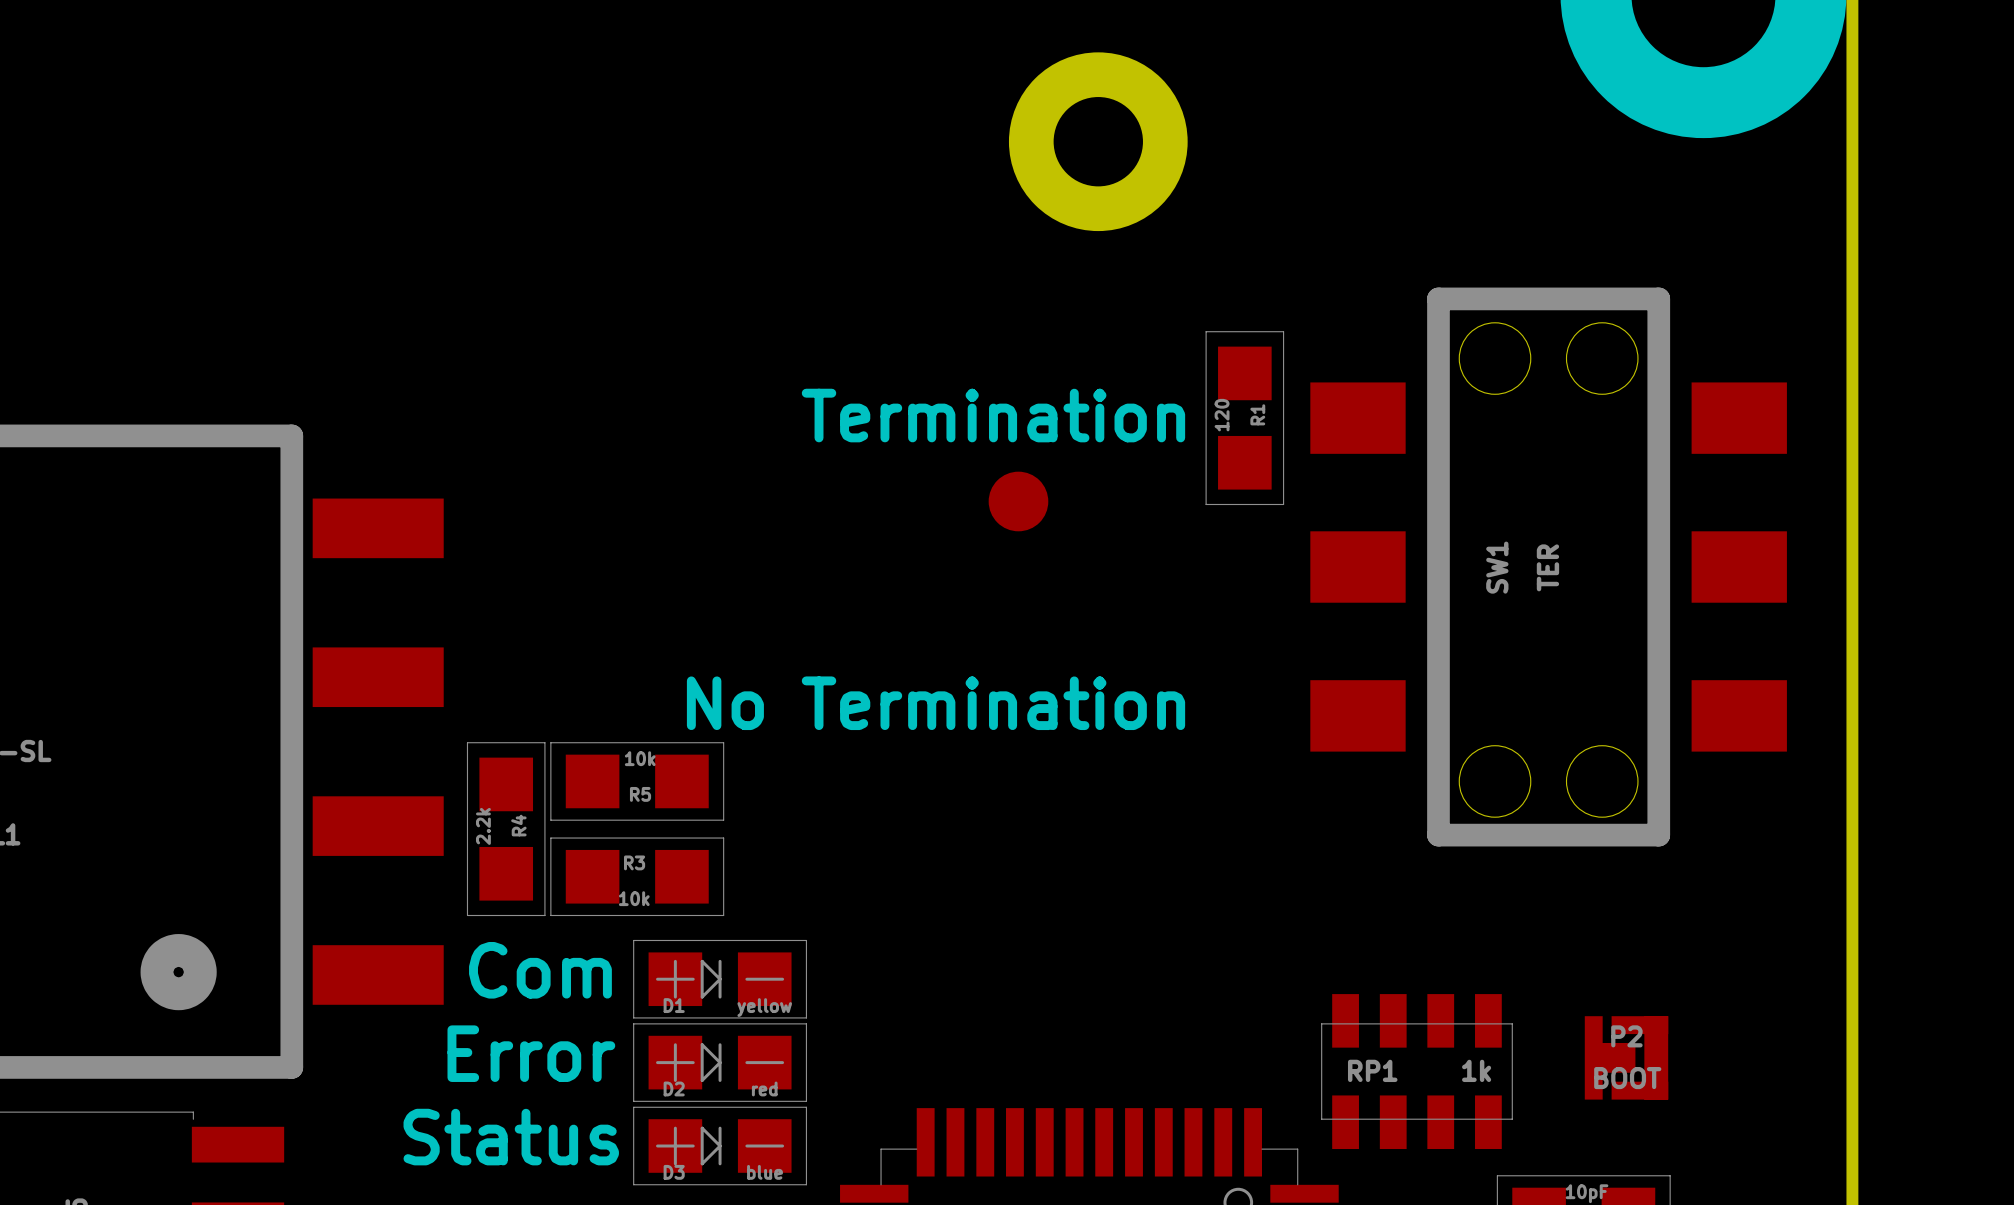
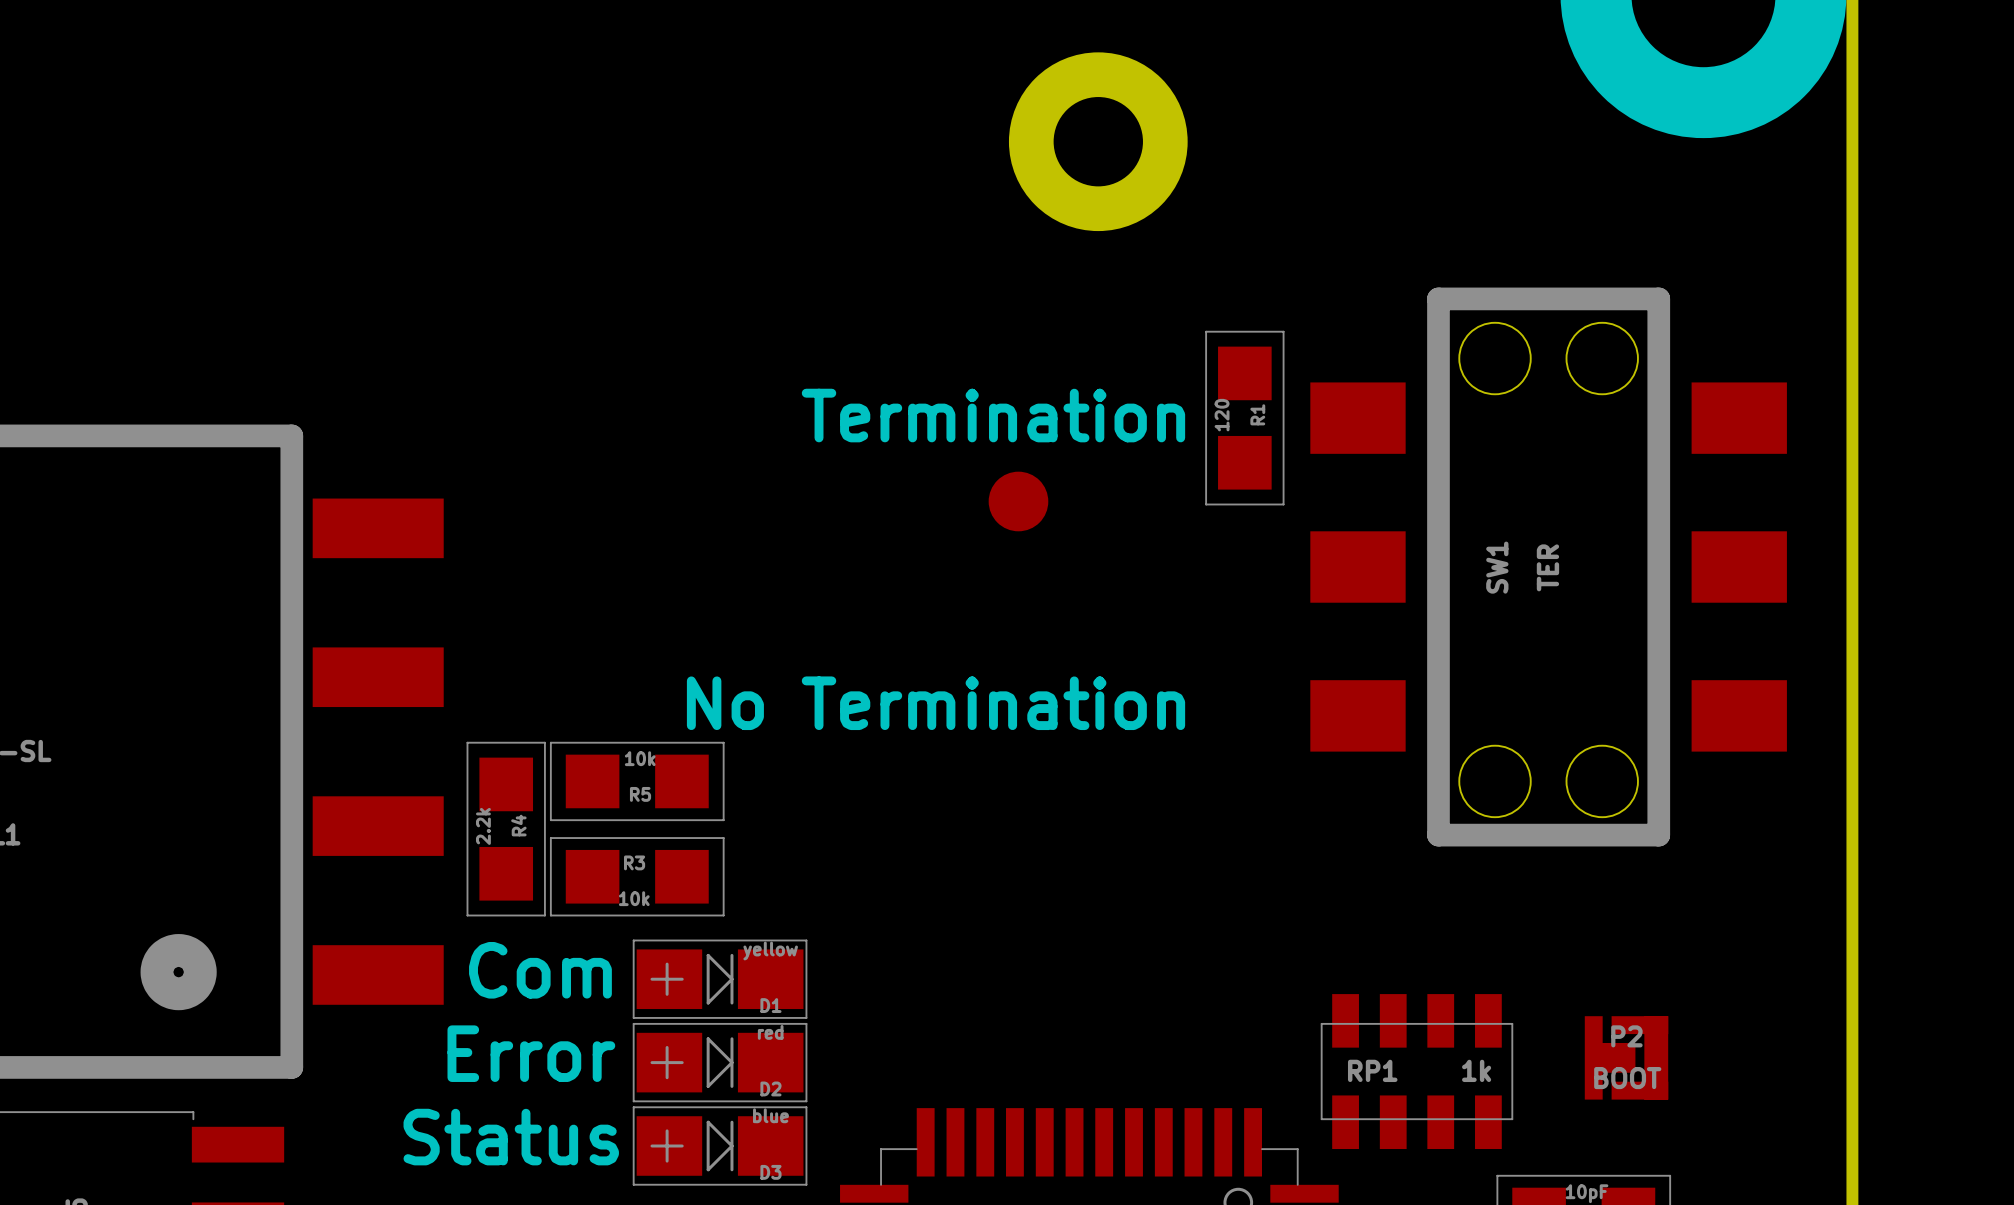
D1 footprint: [633, 940, 807, 1018] -> [633, 940, 807, 1018]
D1 name position: D1 (674, 1005) -> D1 (770, 1005)
D1 value position: yellow (764, 1007) -> yellow (770, 950)
D2 footprint: [633, 1023, 807, 1102] -> [633, 1023, 807, 1102]
D2 name position: D2 (674, 1088) -> D2 (770, 1088)
D2 value position: red (764, 1088) -> red (770, 1032)
D3 footprint: [633, 1107, 807, 1185] -> [633, 1107, 807, 1185]
D3 name position: D3 (674, 1172) -> D3 (770, 1172)
D3 value position: blue (765, 1172) -> blue (770, 1115)

